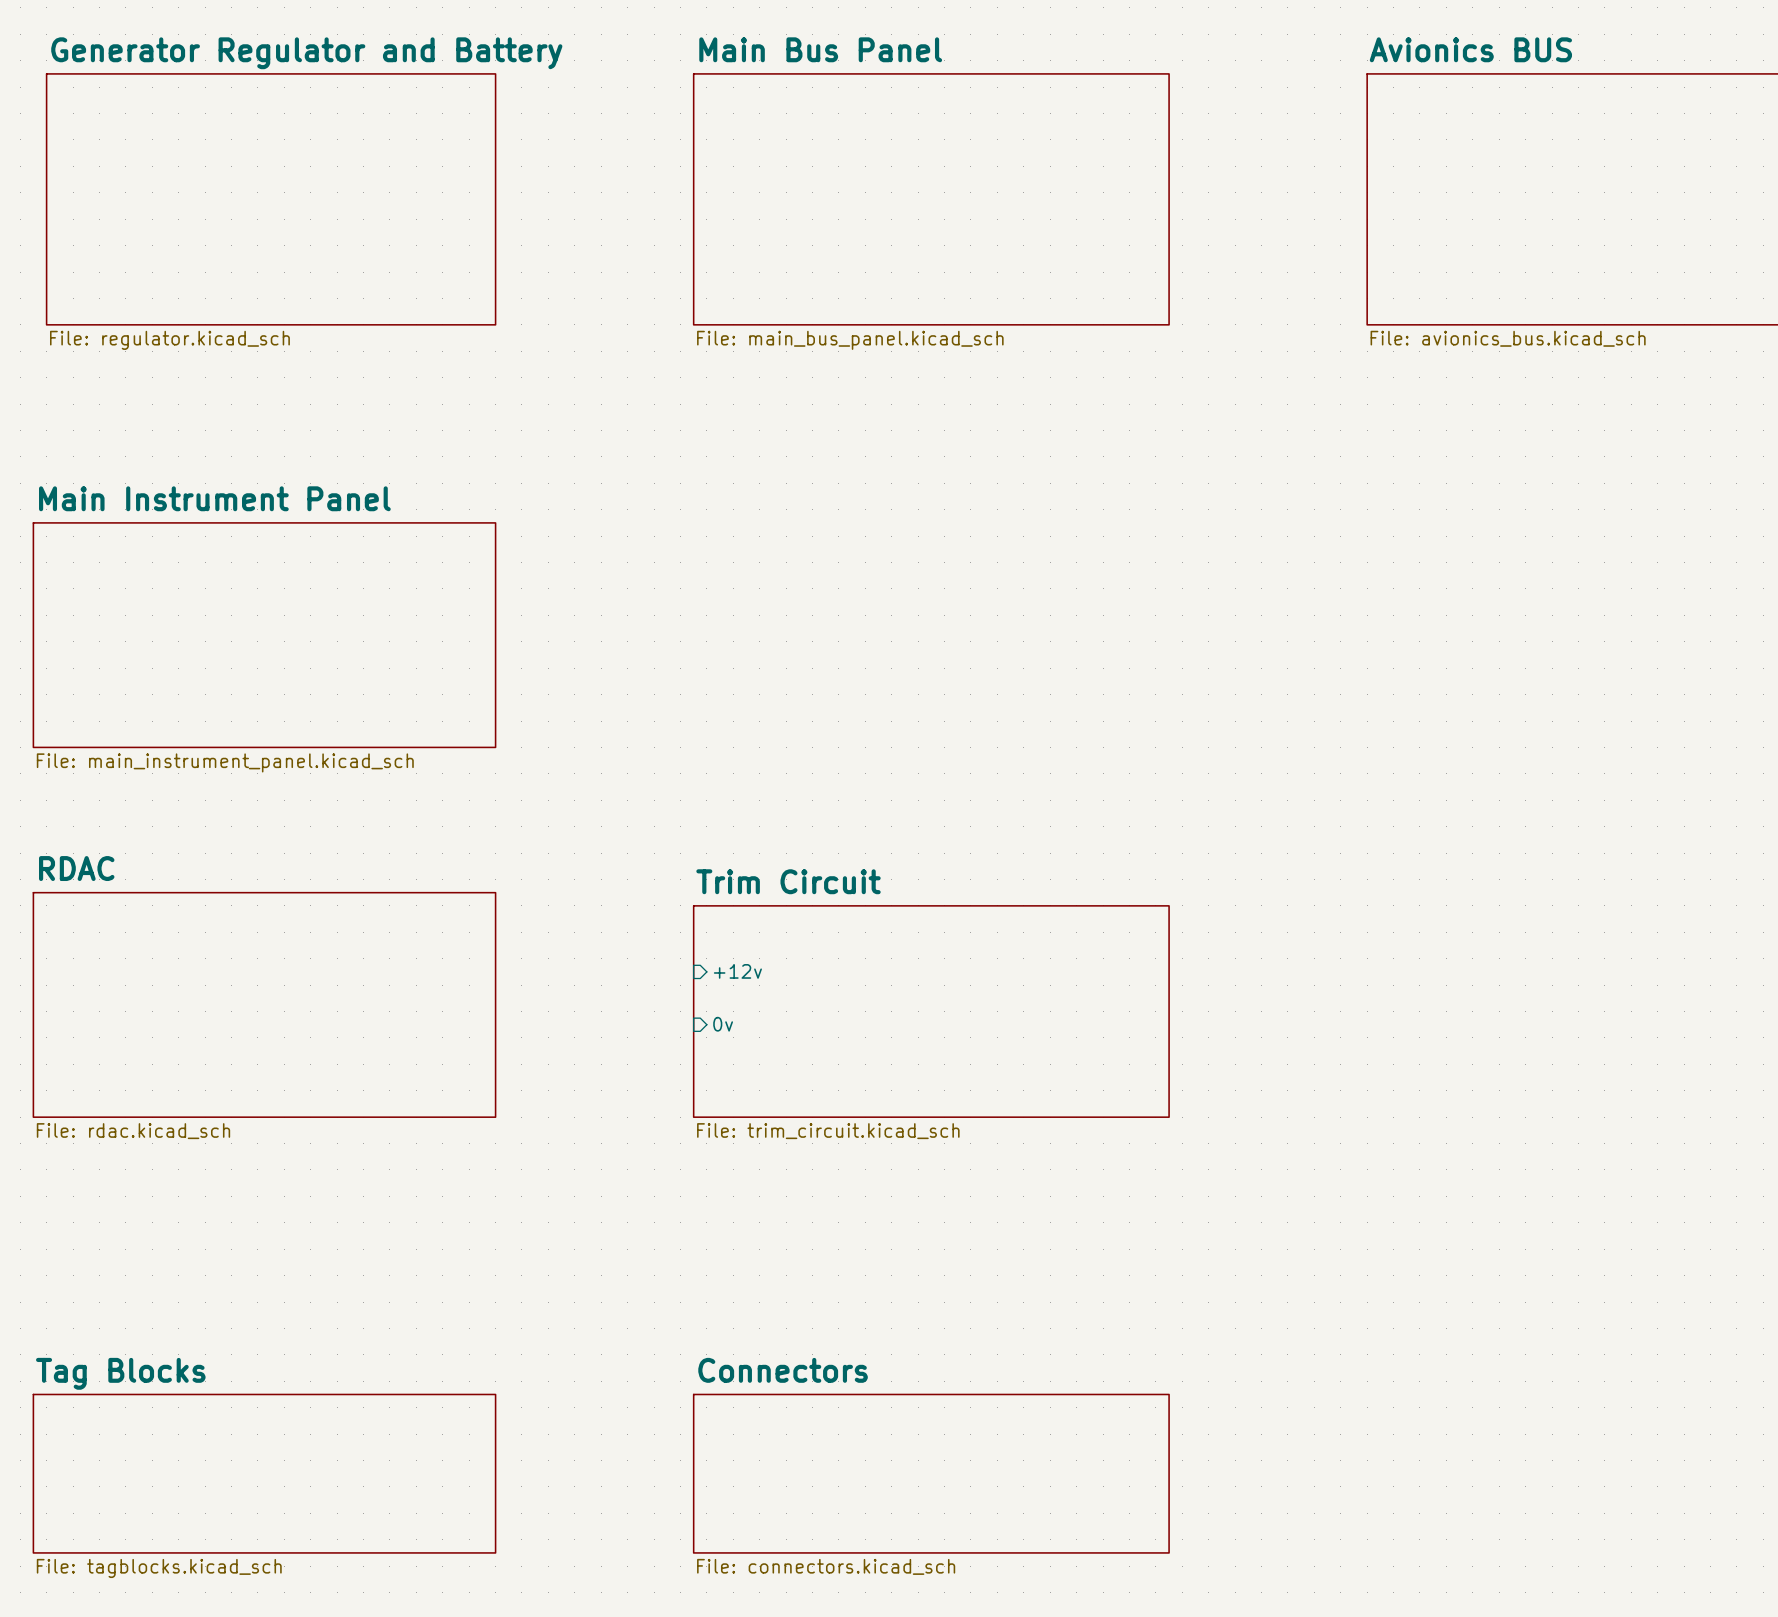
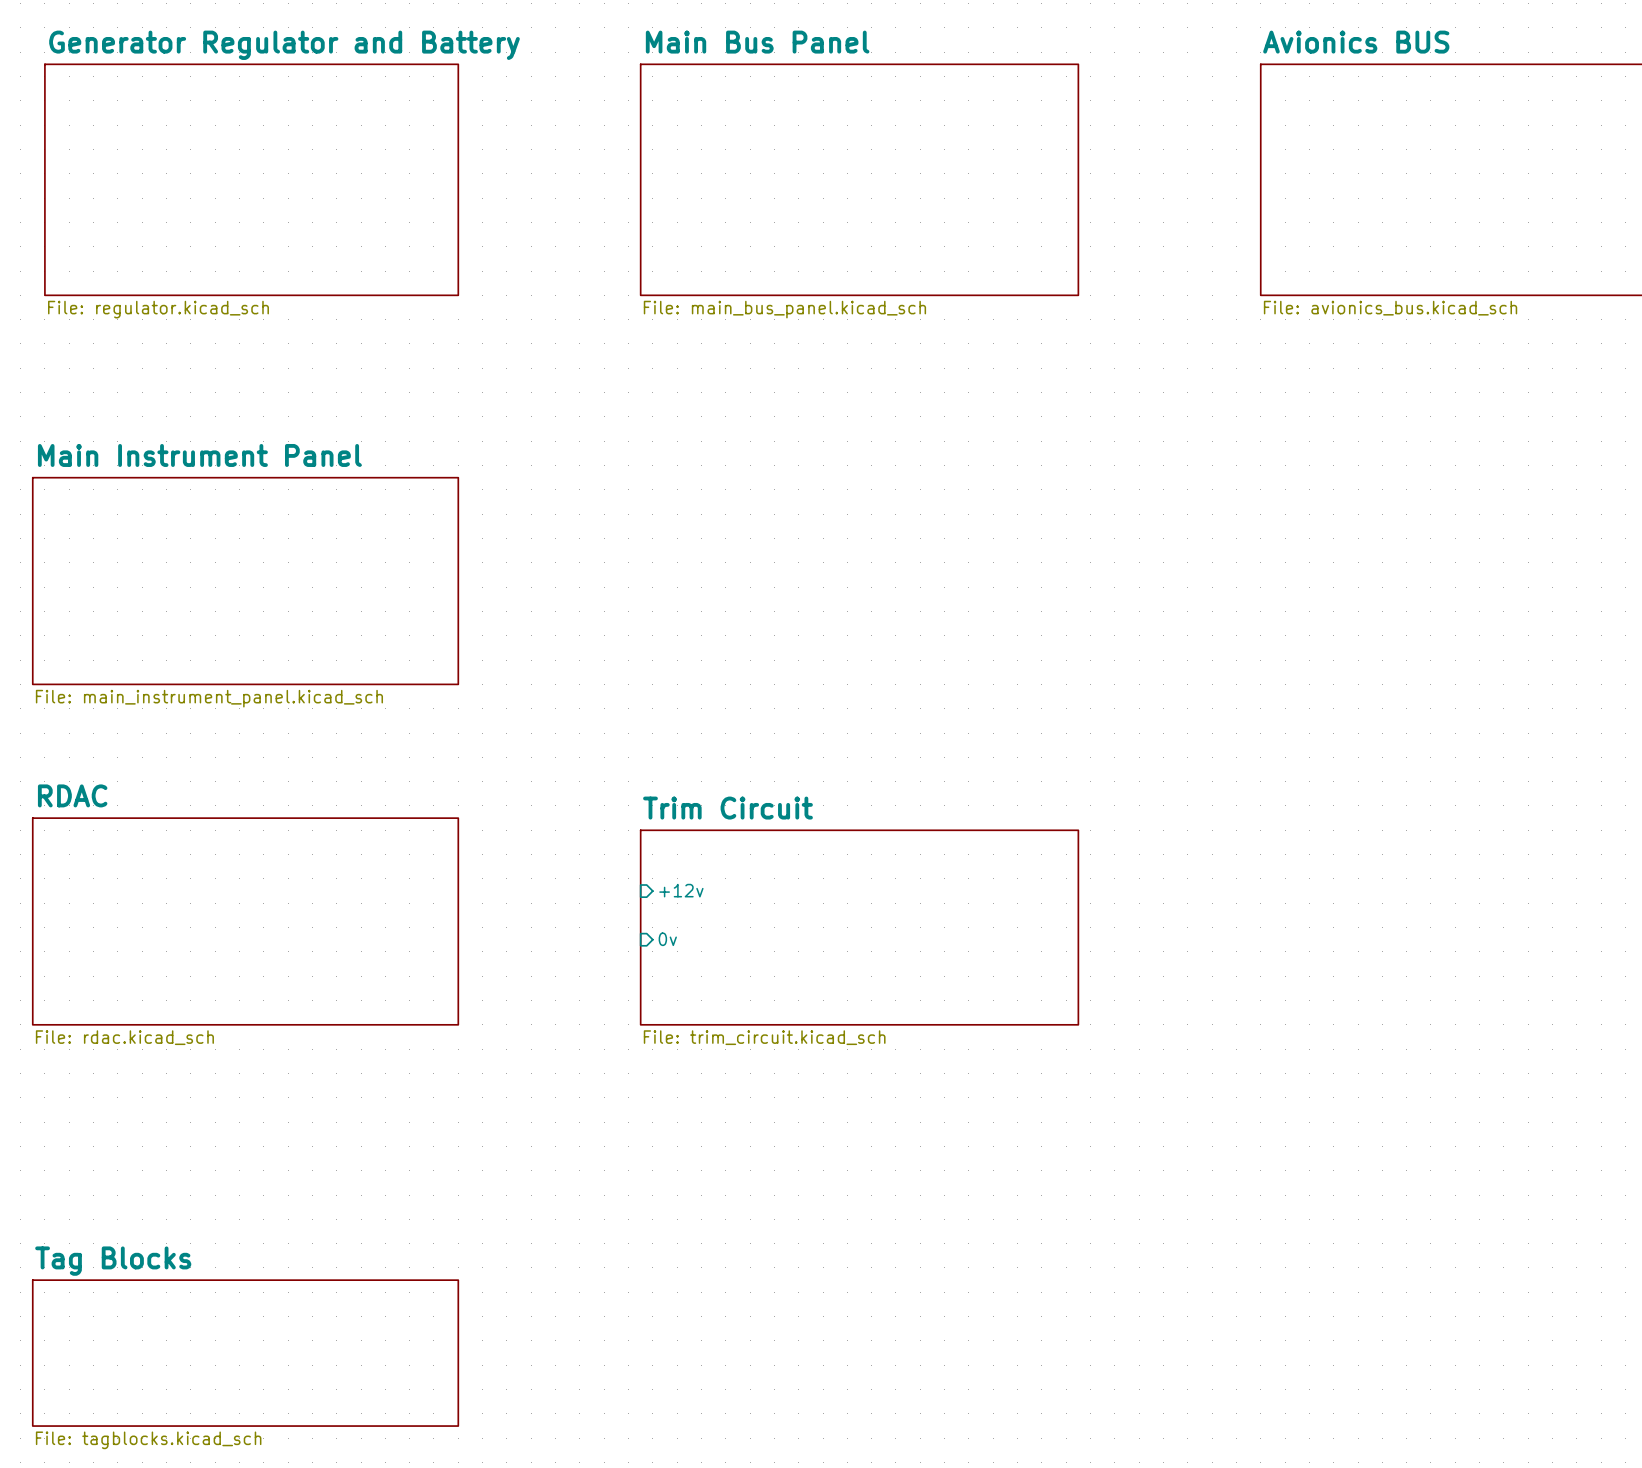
sheet Connectors: File: connectors.kicad_sch (931, 1473) -> none

